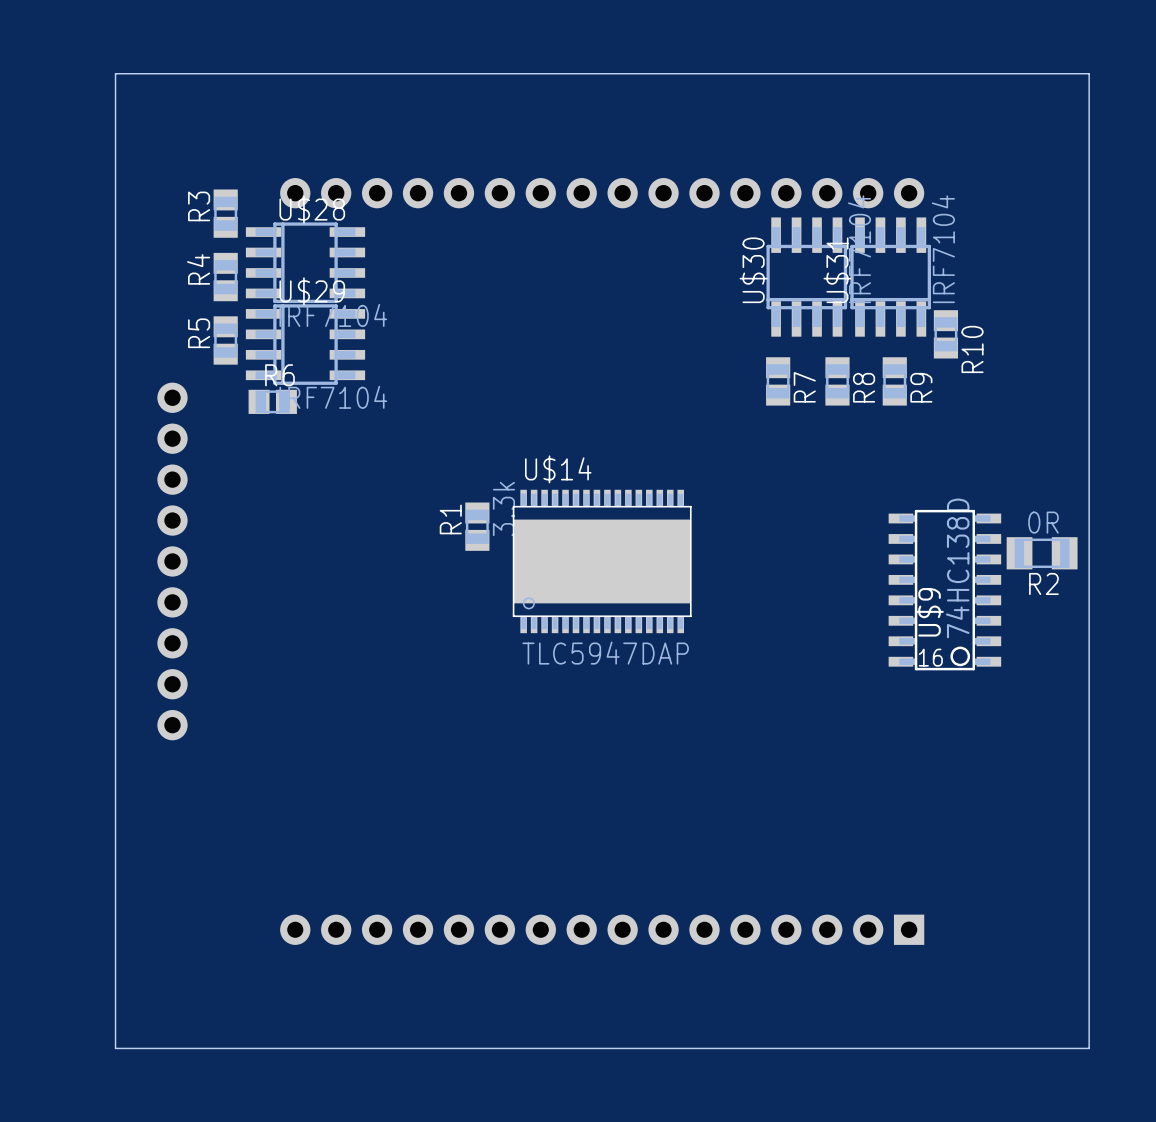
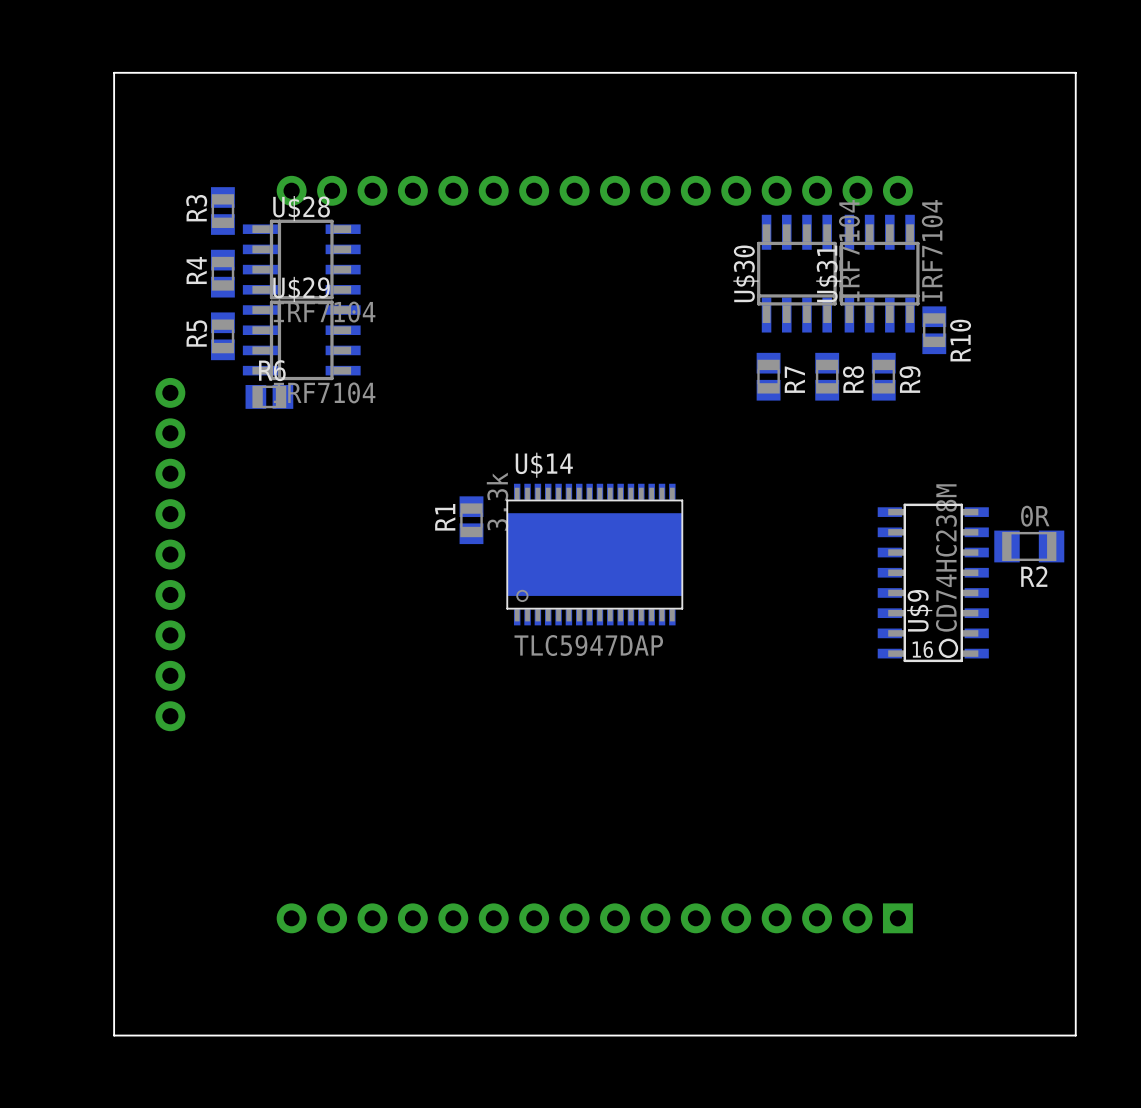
U$9 value: 74HC138D (957, 568) -> CD74HC238M (946, 557)

